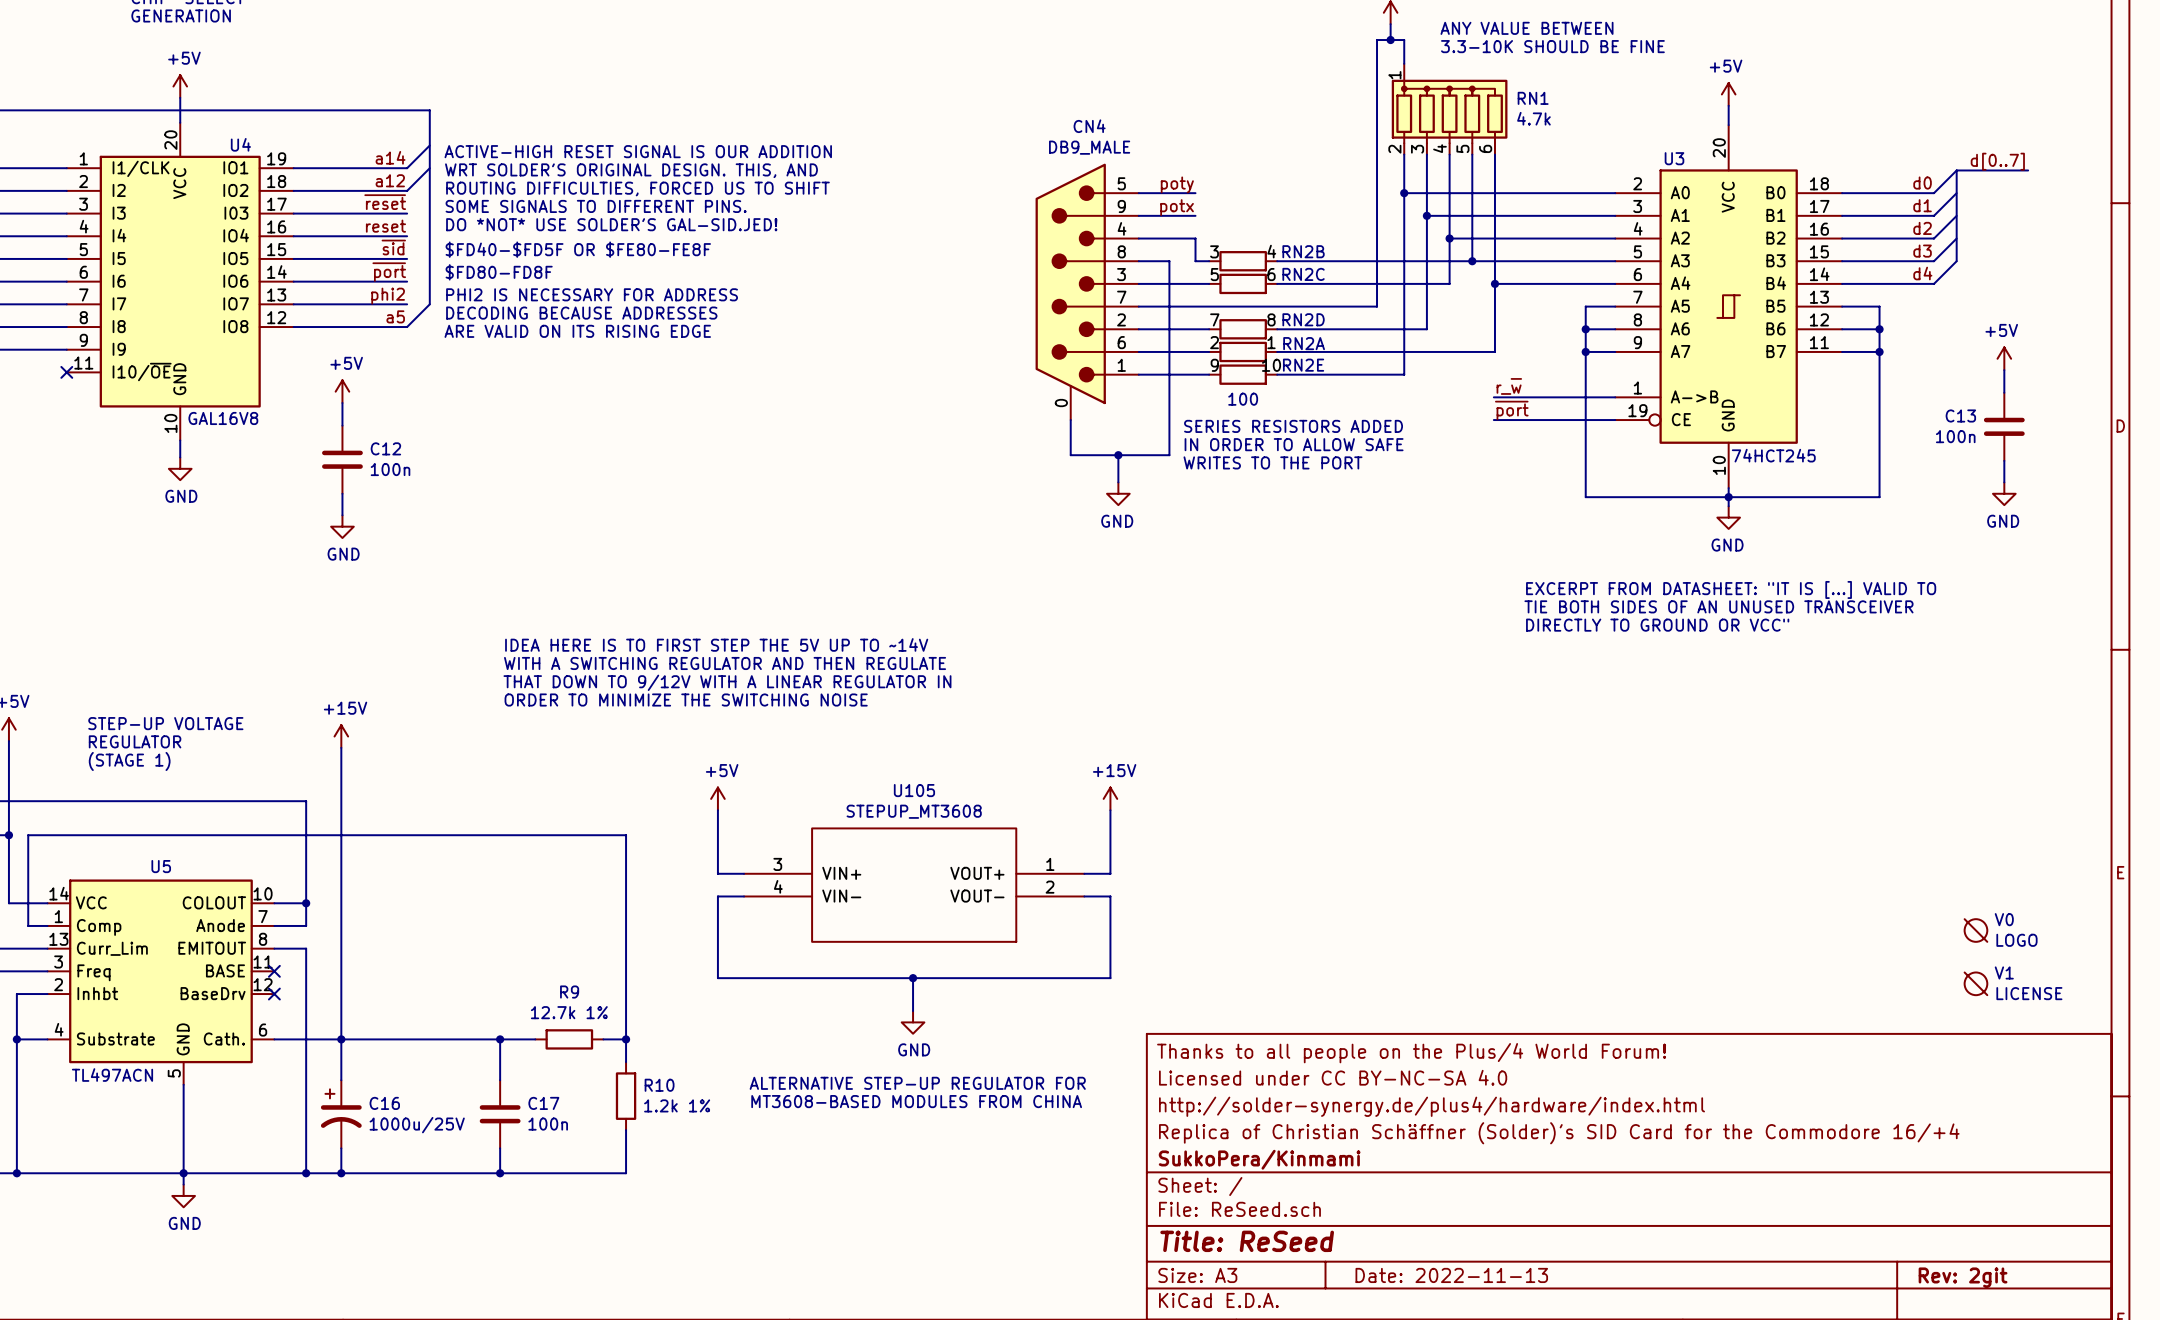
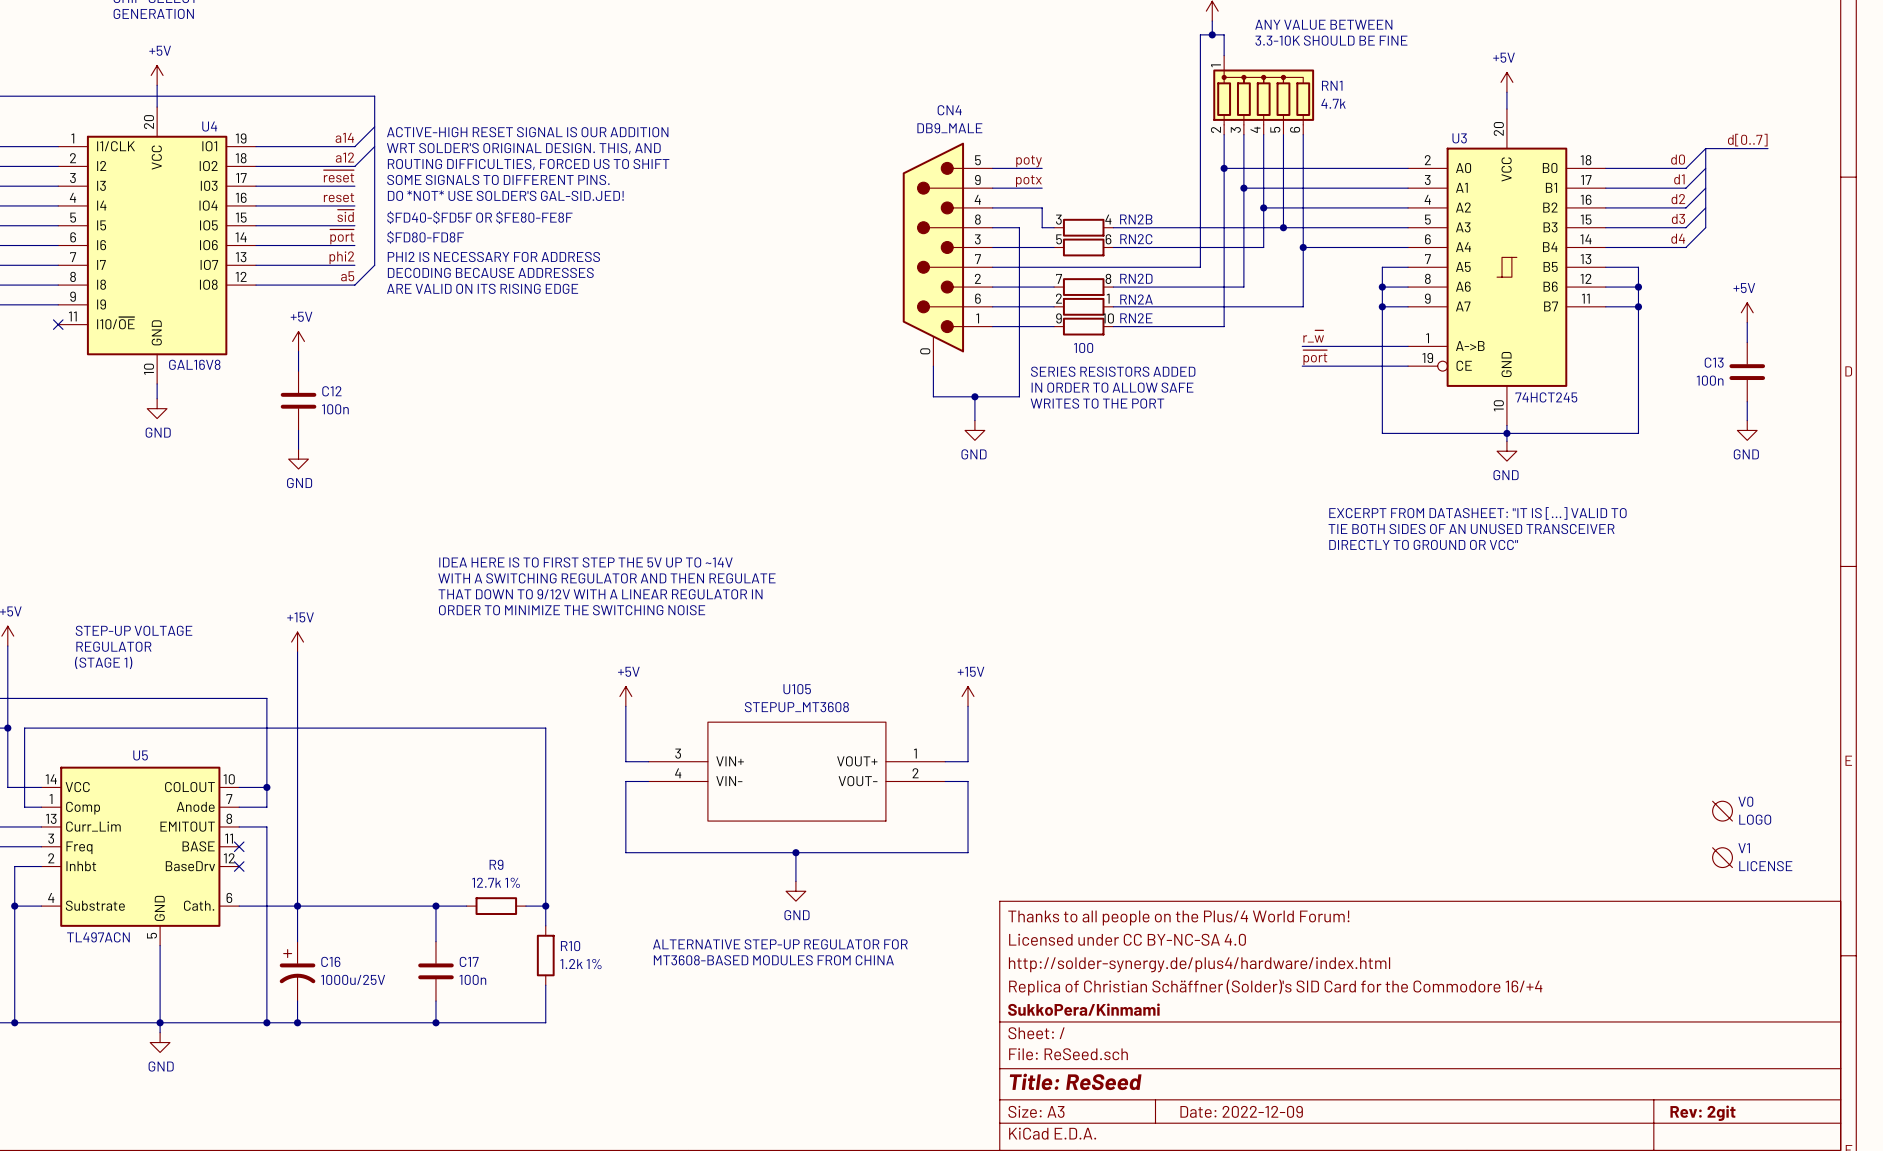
title block: Date: 2022-11-13 (1451, 1275) -> Date: 2022-12-09 (1241, 1111)

